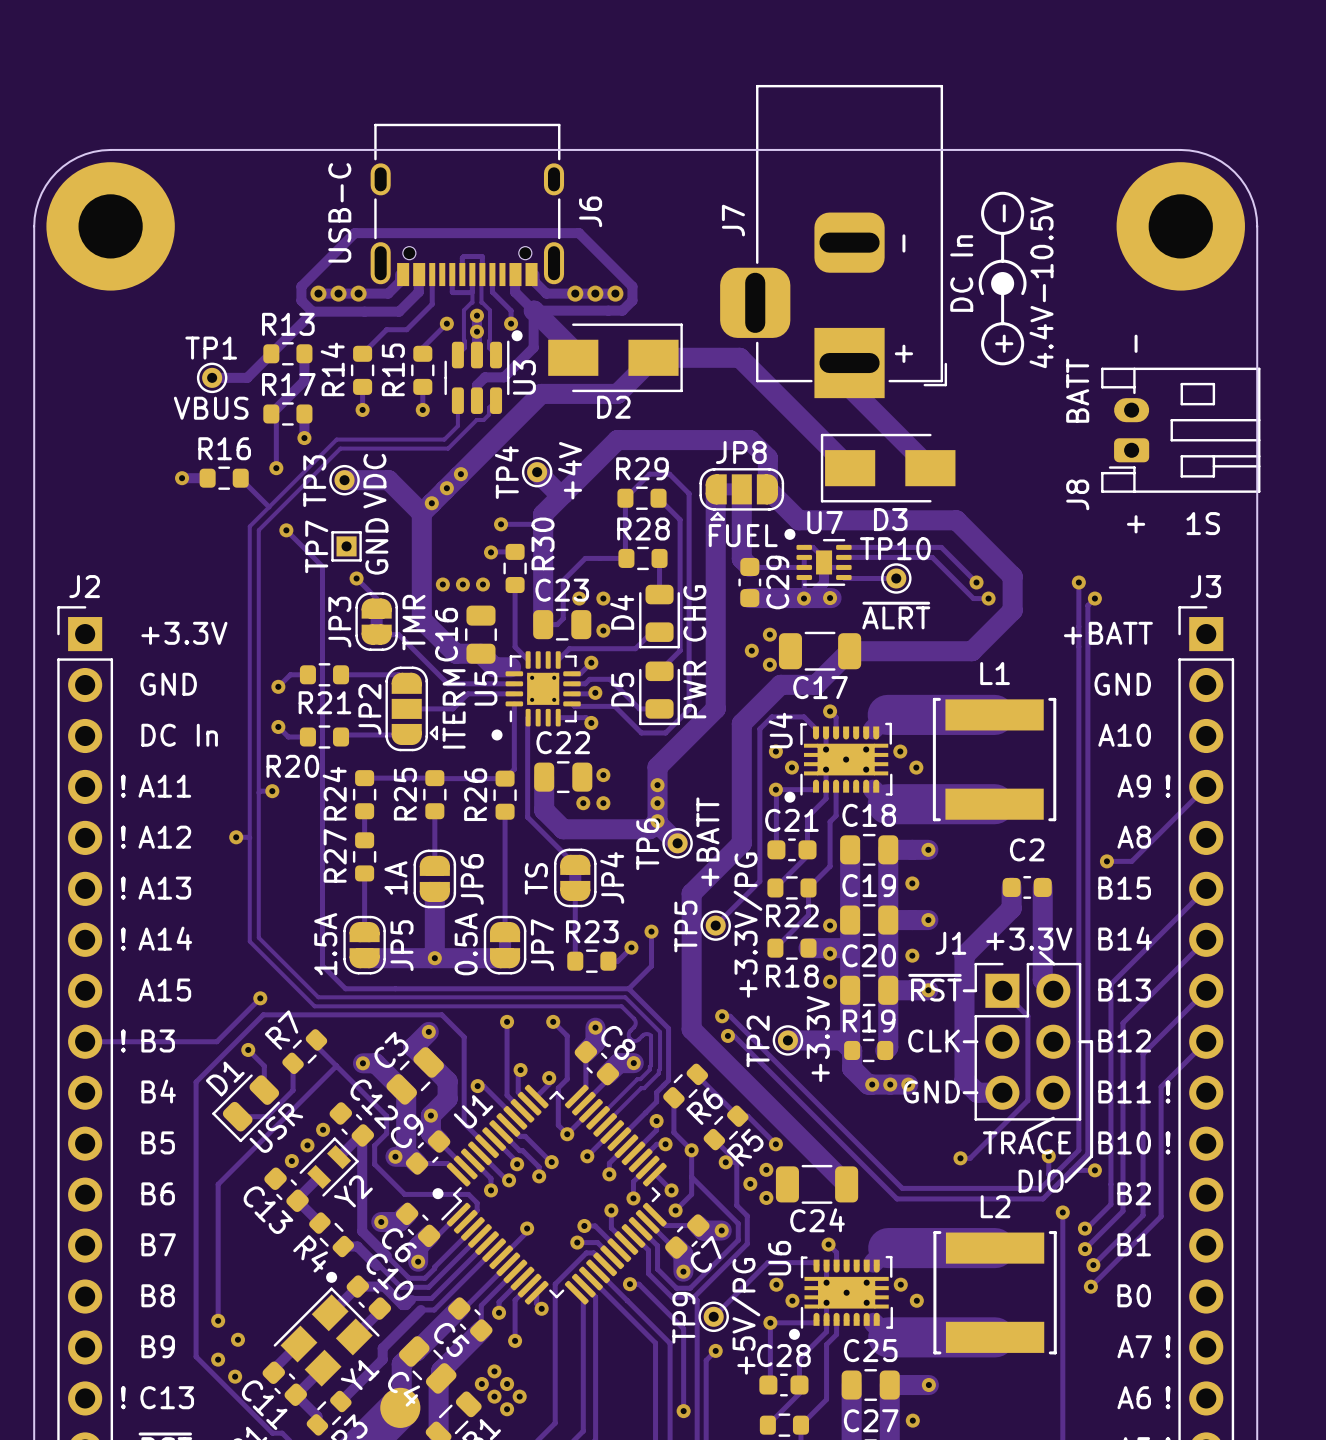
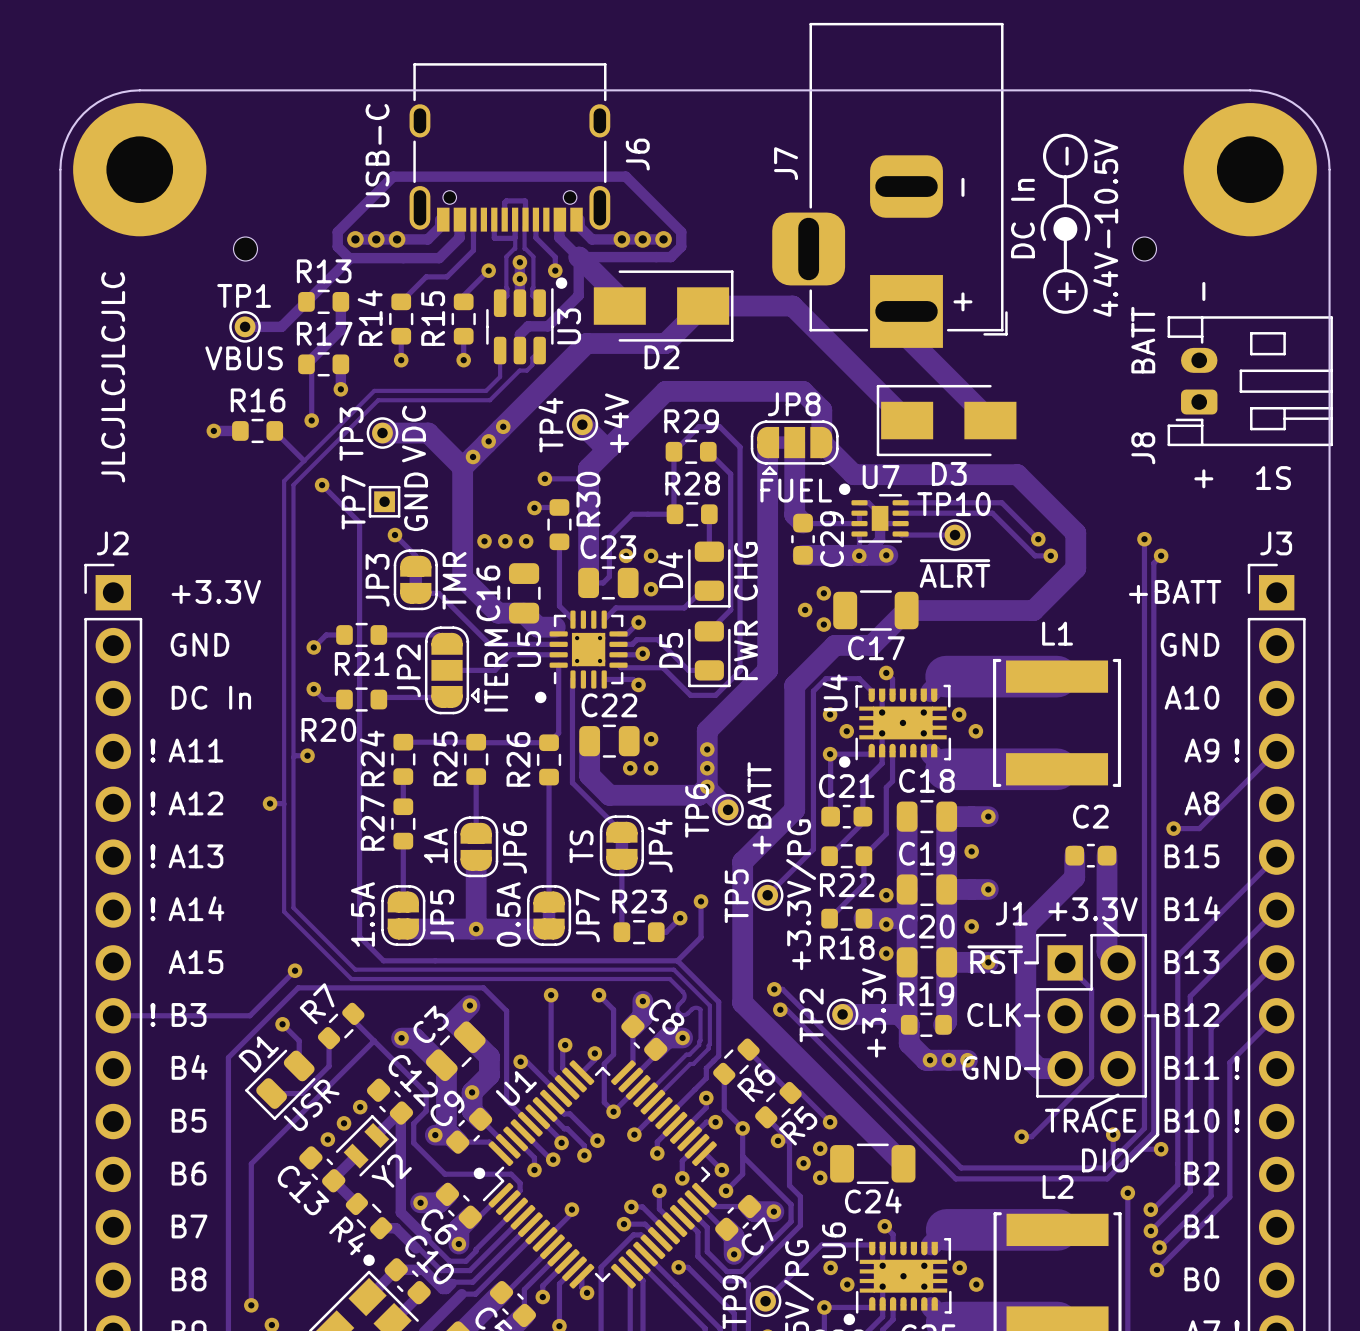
part: none -> (245, 248)
part: none -> (1144, 248)
text: none -> JLCJLCJLCJLC (113, 377)

